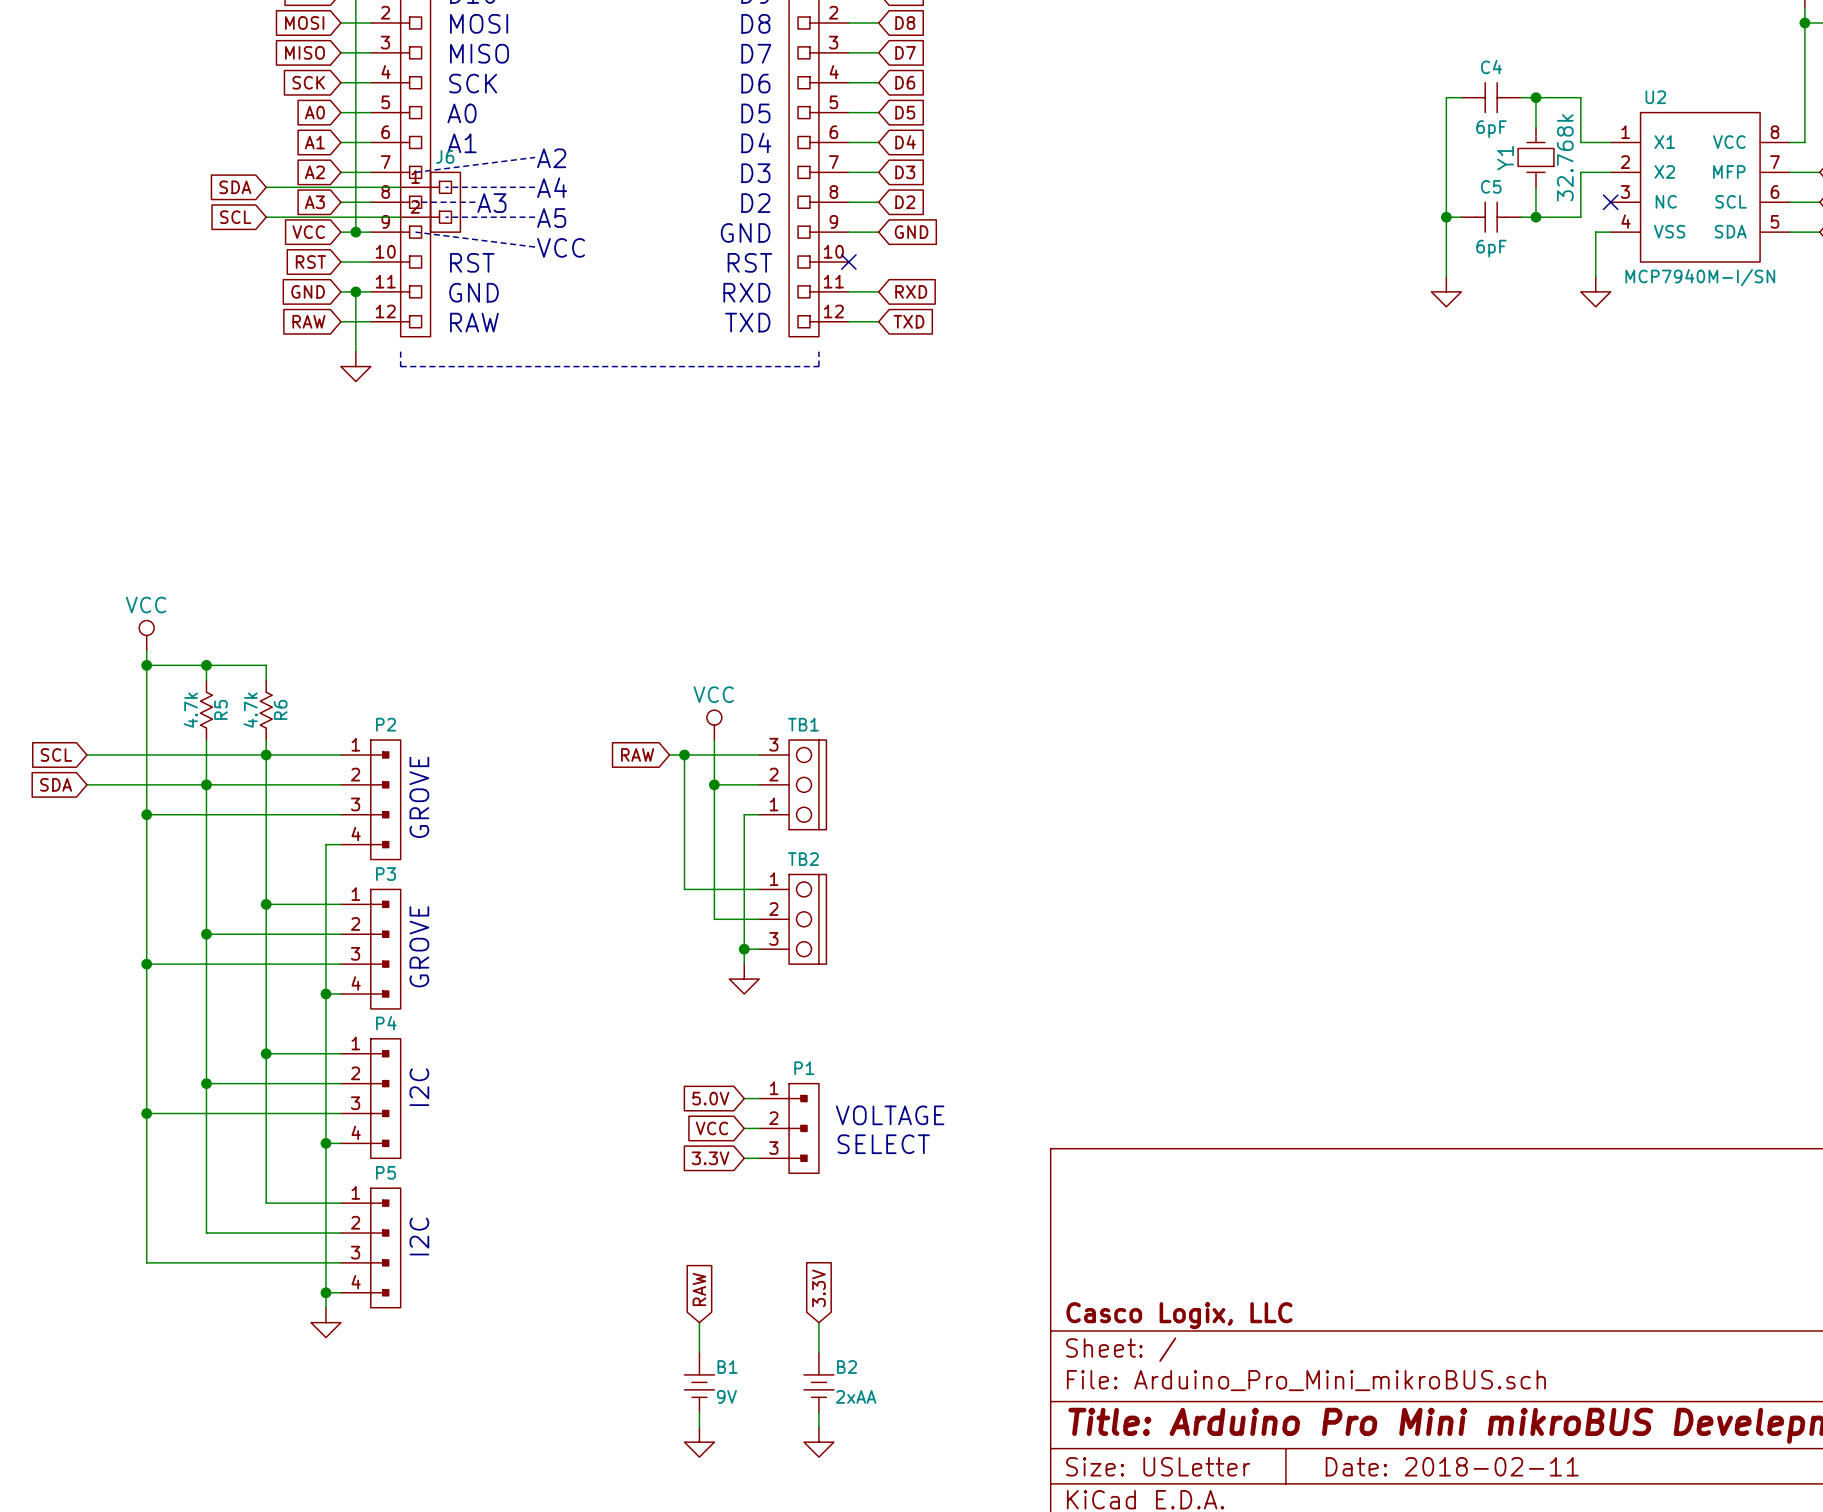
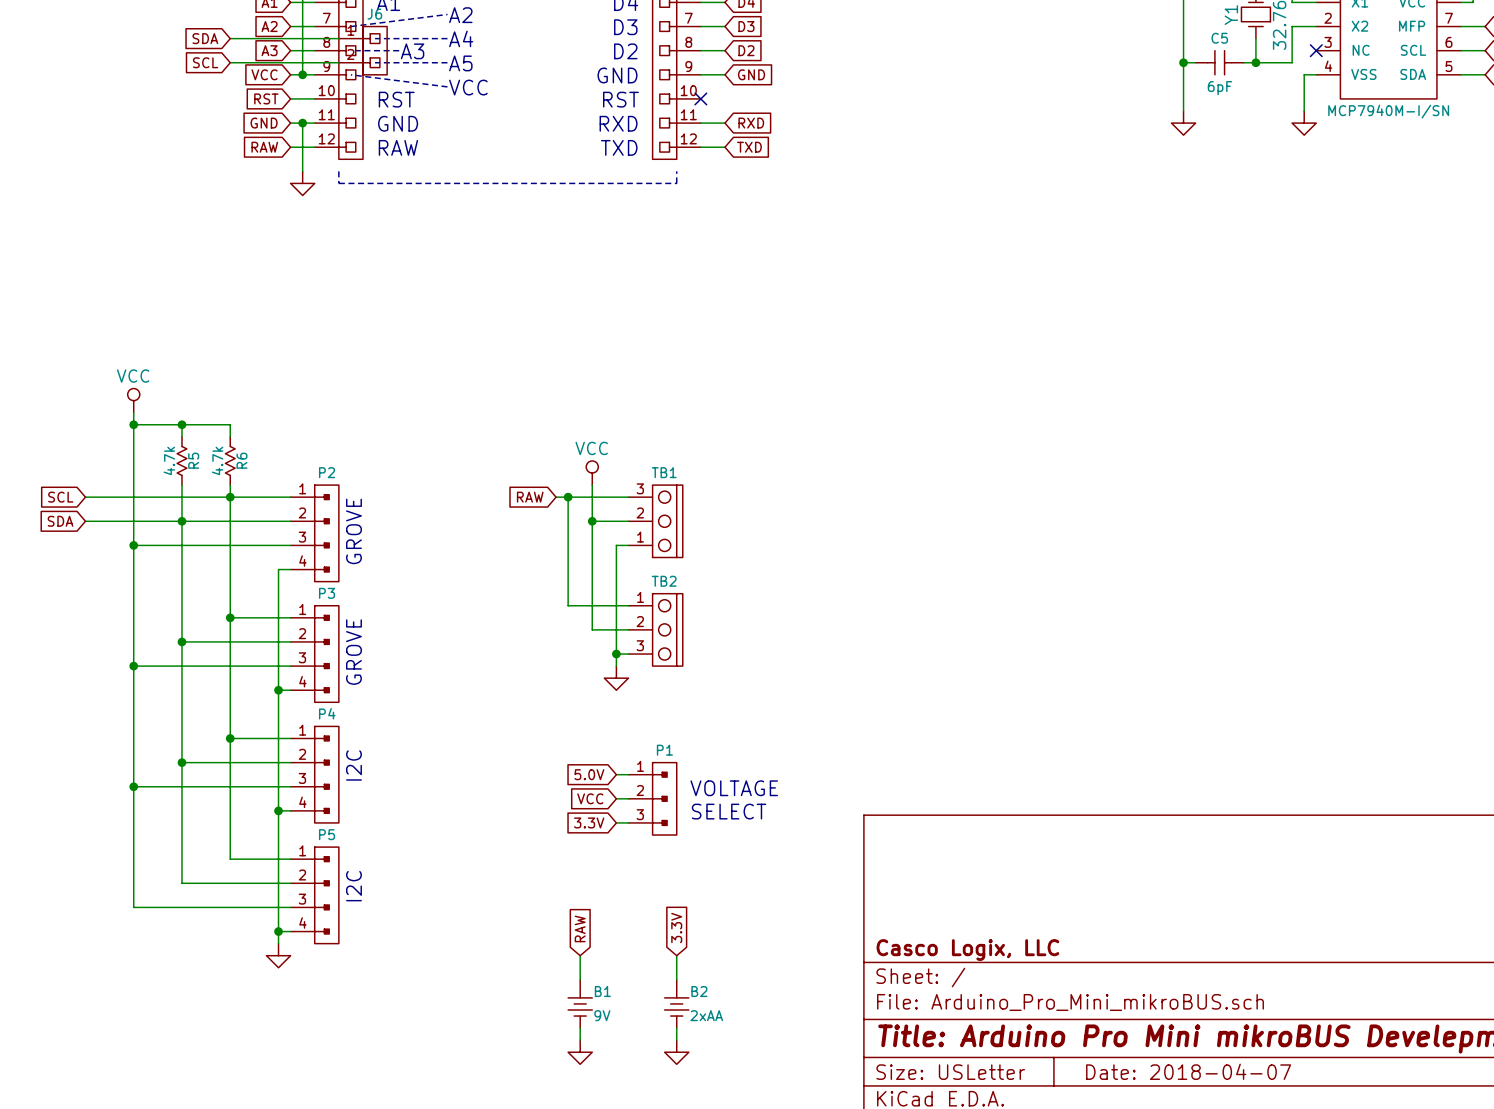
title block: Date: 2018-02-11 (1452, 1466) -> Date: 2018-04-07 (1188, 1071)

